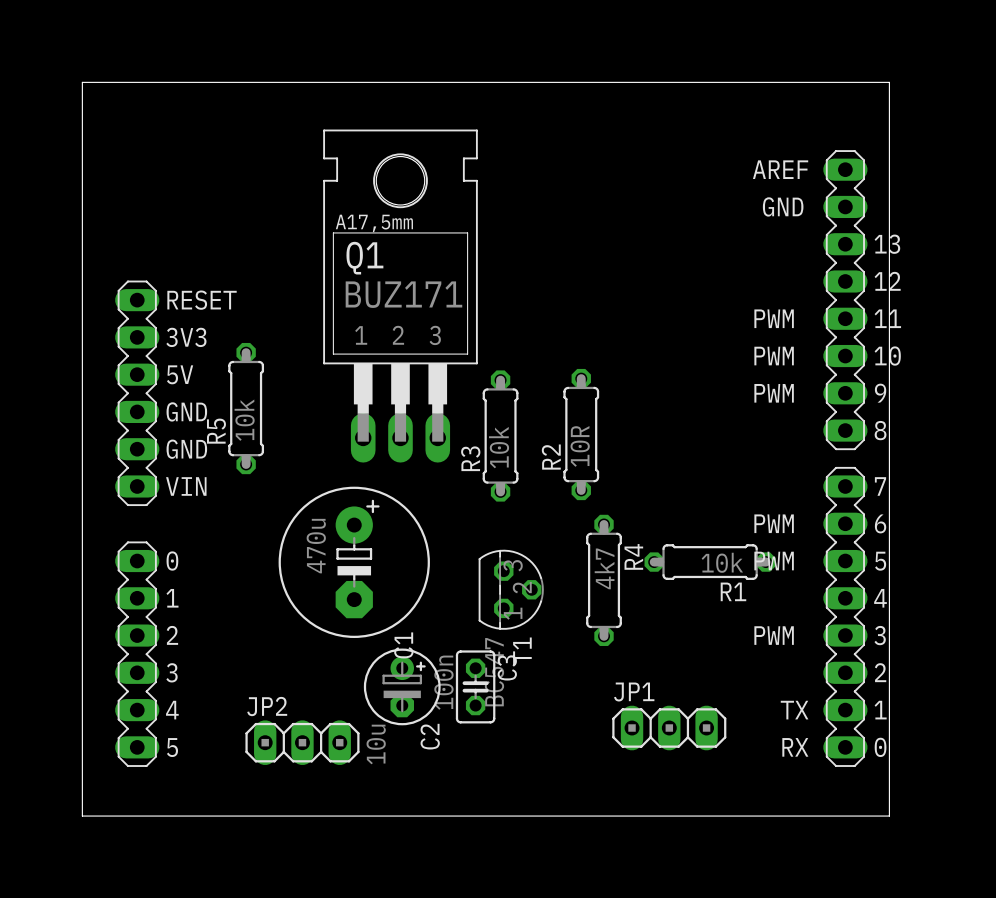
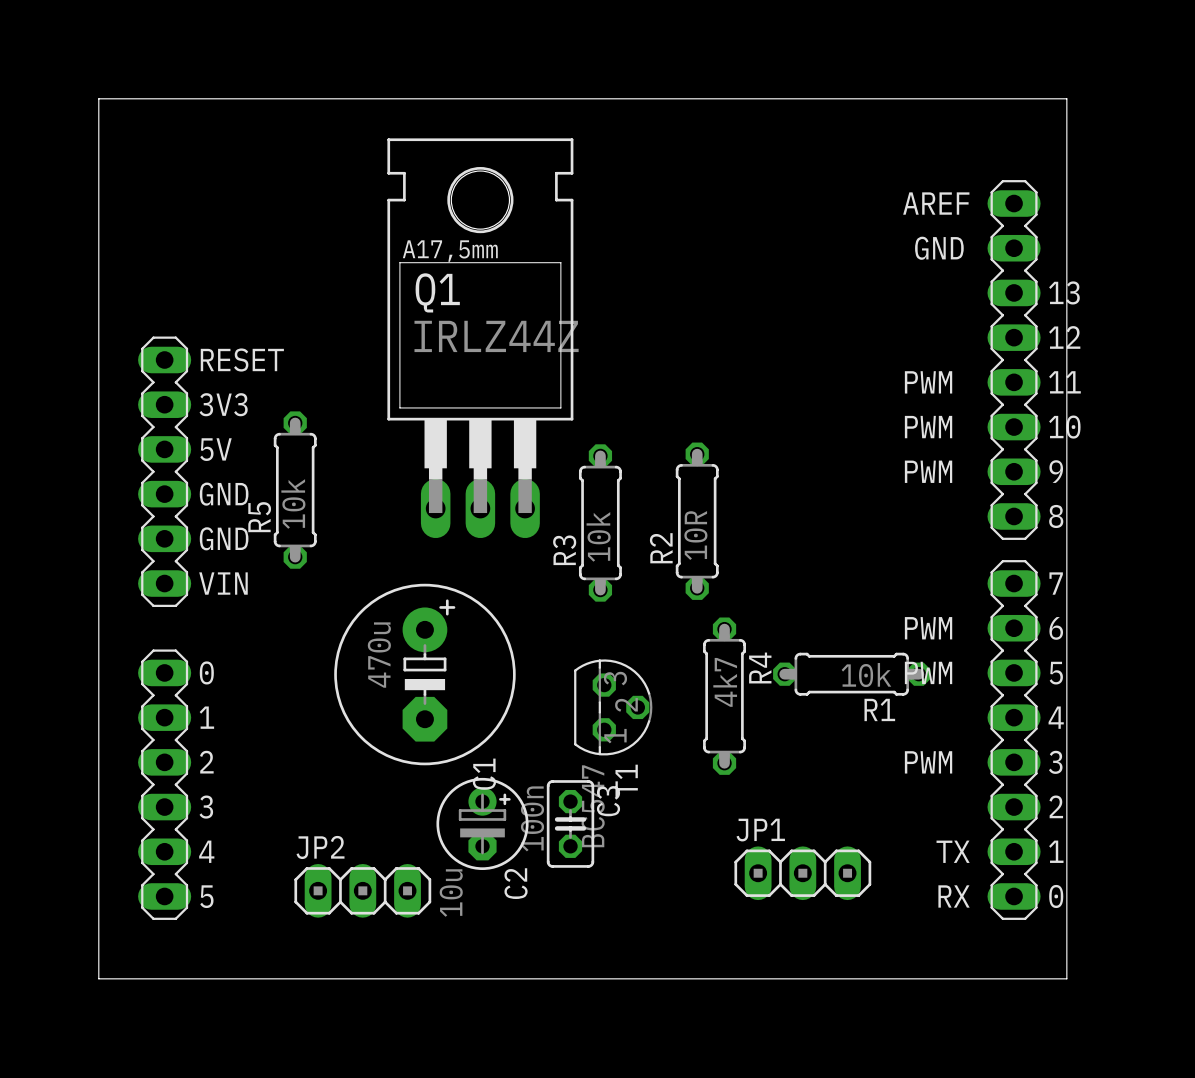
Q1 footprint: [323, 129, 478, 463] -> [387, 138, 574, 539]
Q1 value: BUZ171 (403, 294) -> IRLZ44Z (496, 336)

